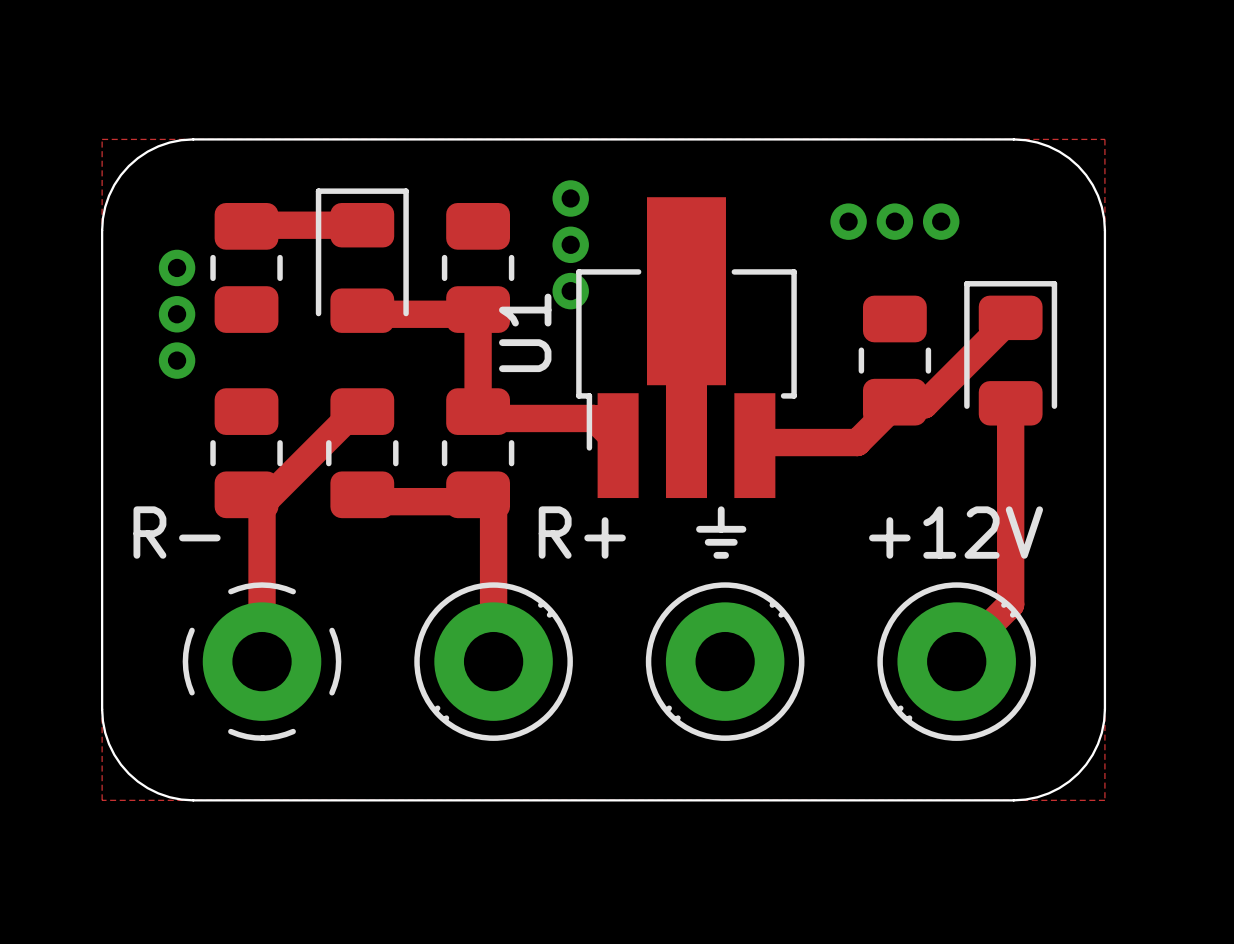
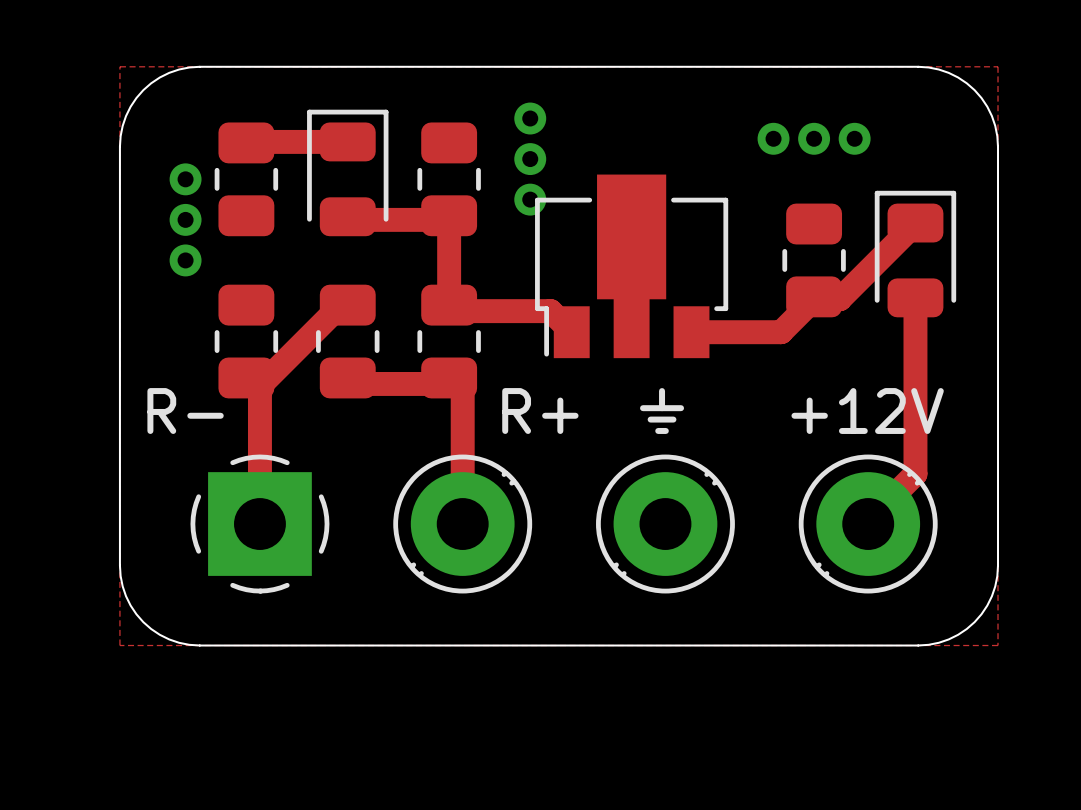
U1: (686, 347) -> none
part: none -> (631, 266)
part footprint: [182, 582, 1037, 741] -> [190, 454, 938, 594]

